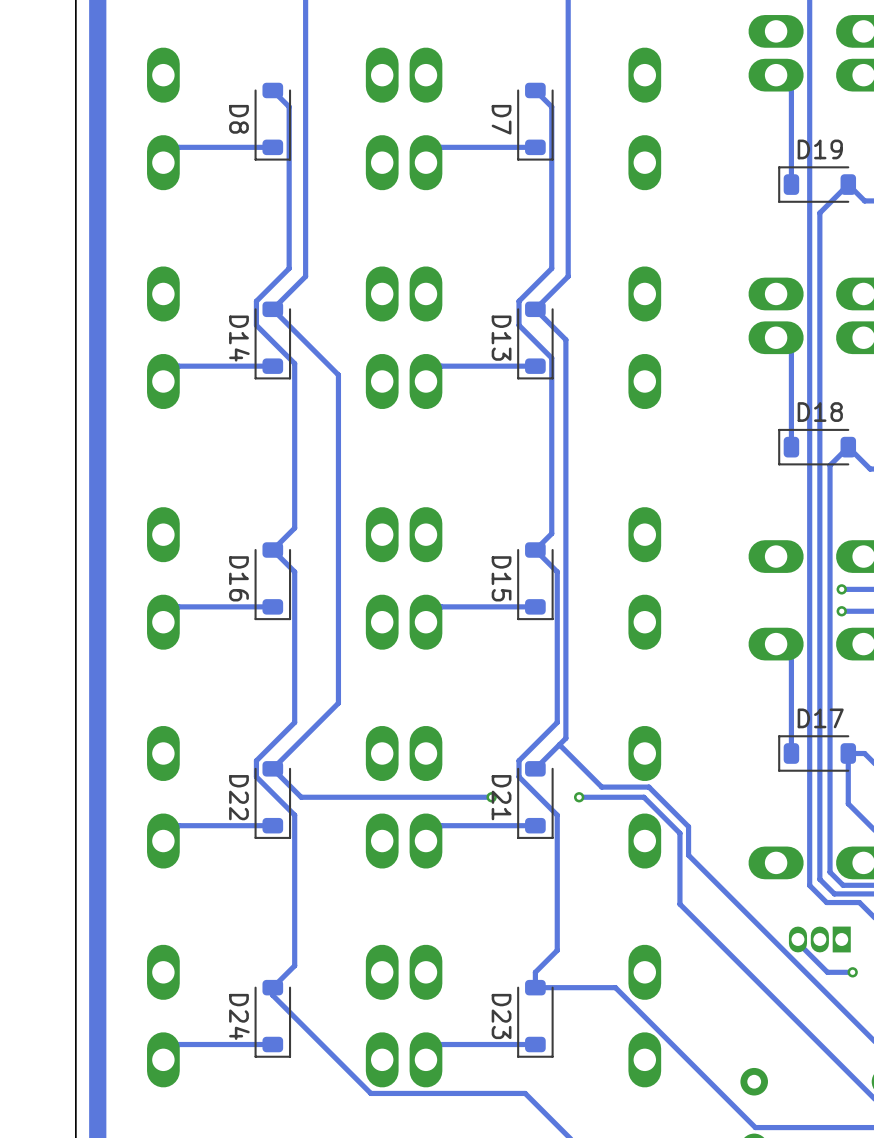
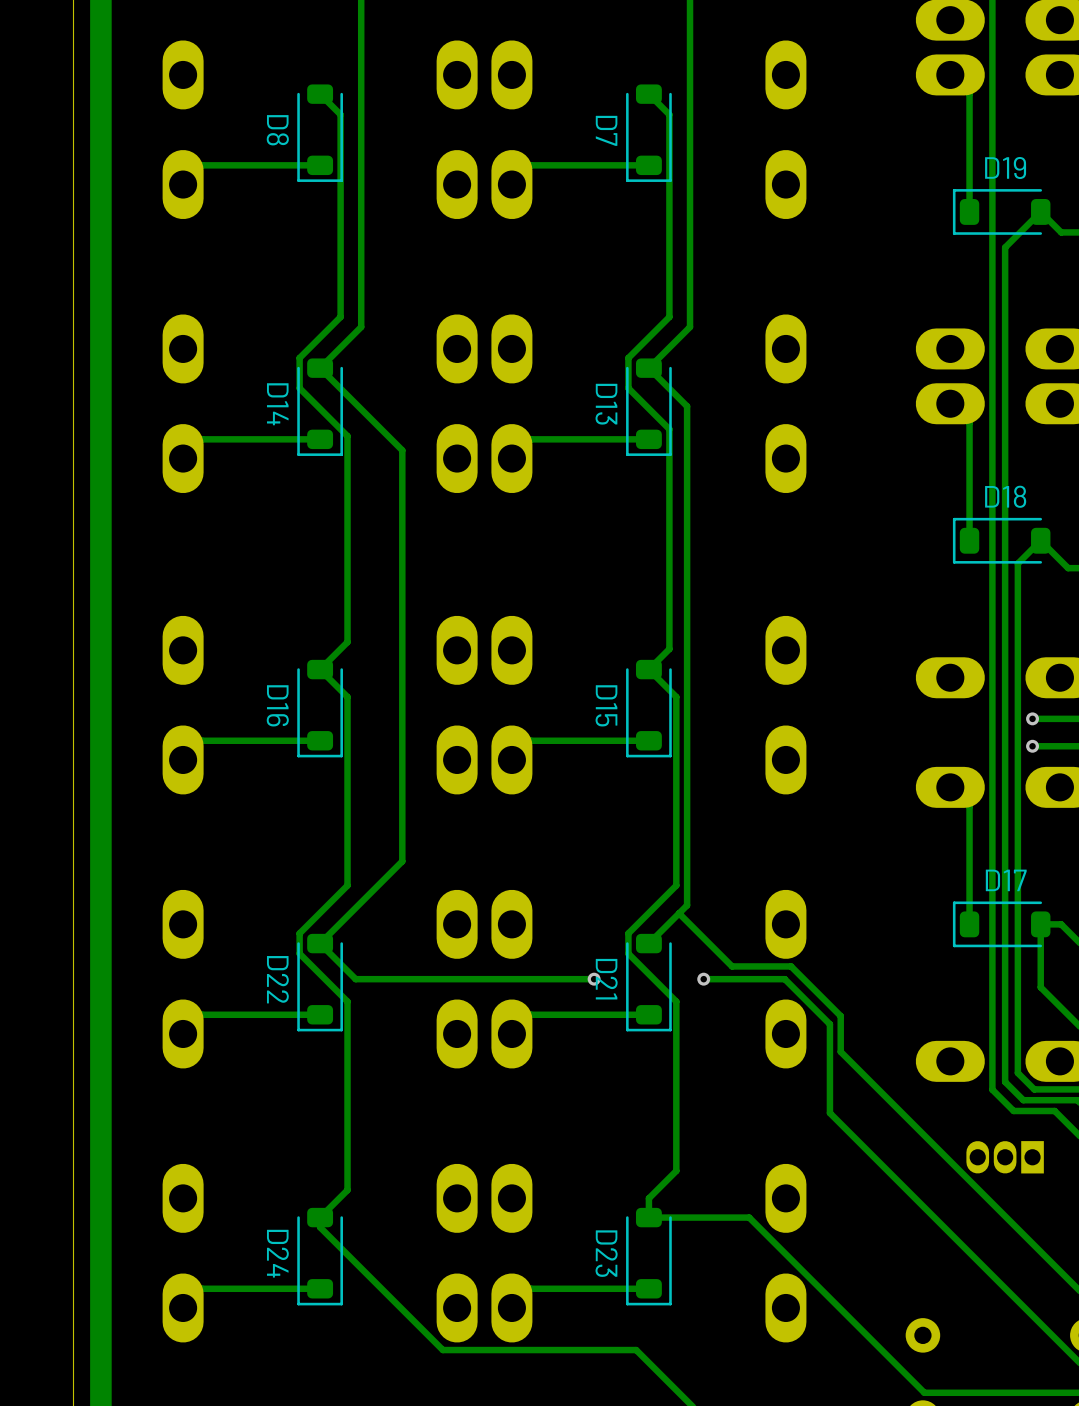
track: (797, 939) (797, 942) (827, 972) (852, 972) -> none
via: (852, 972) -> none

